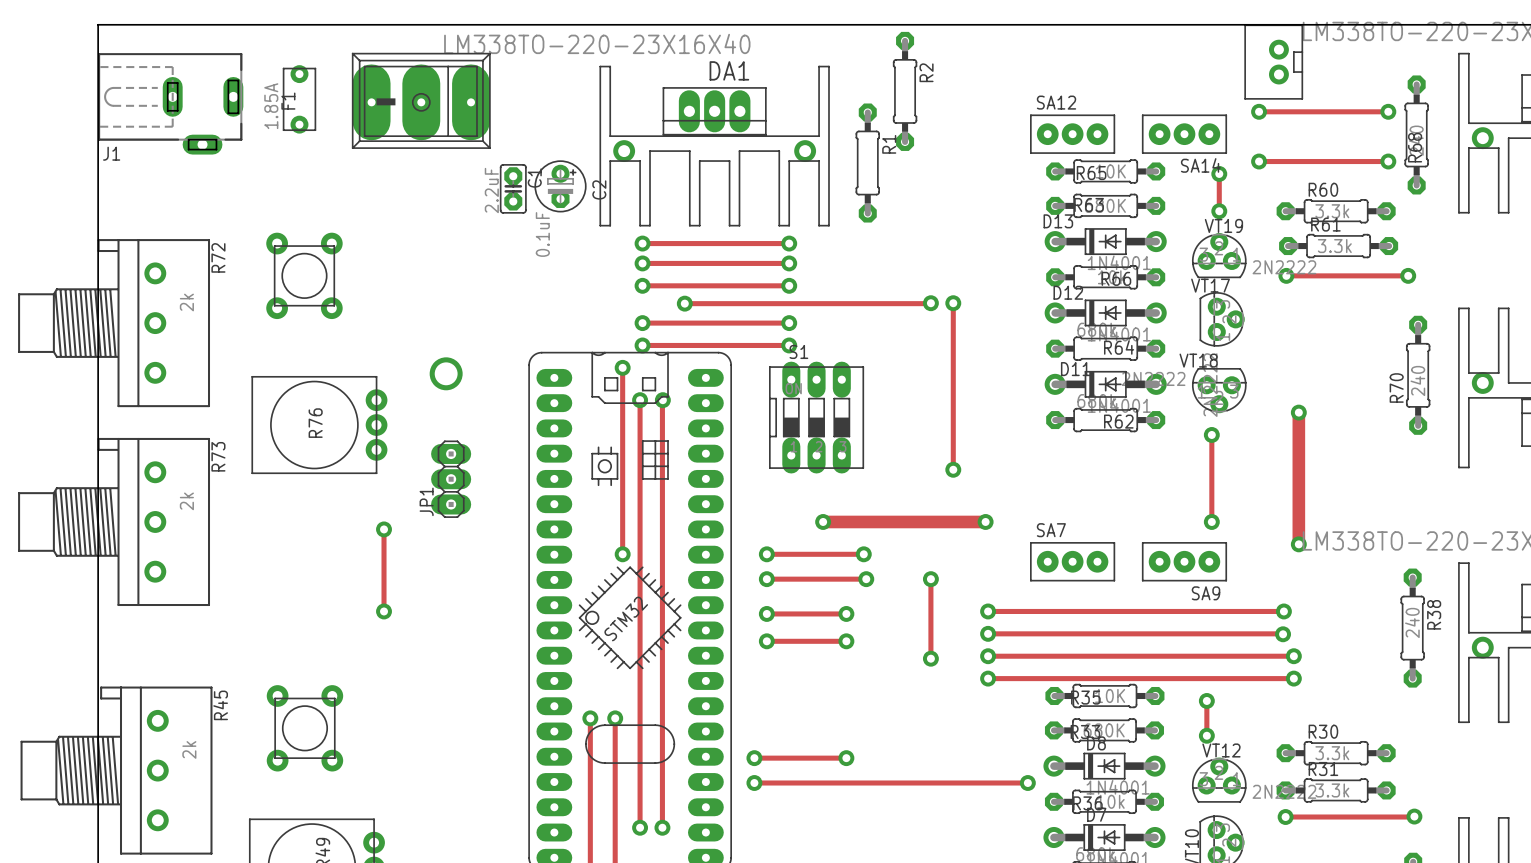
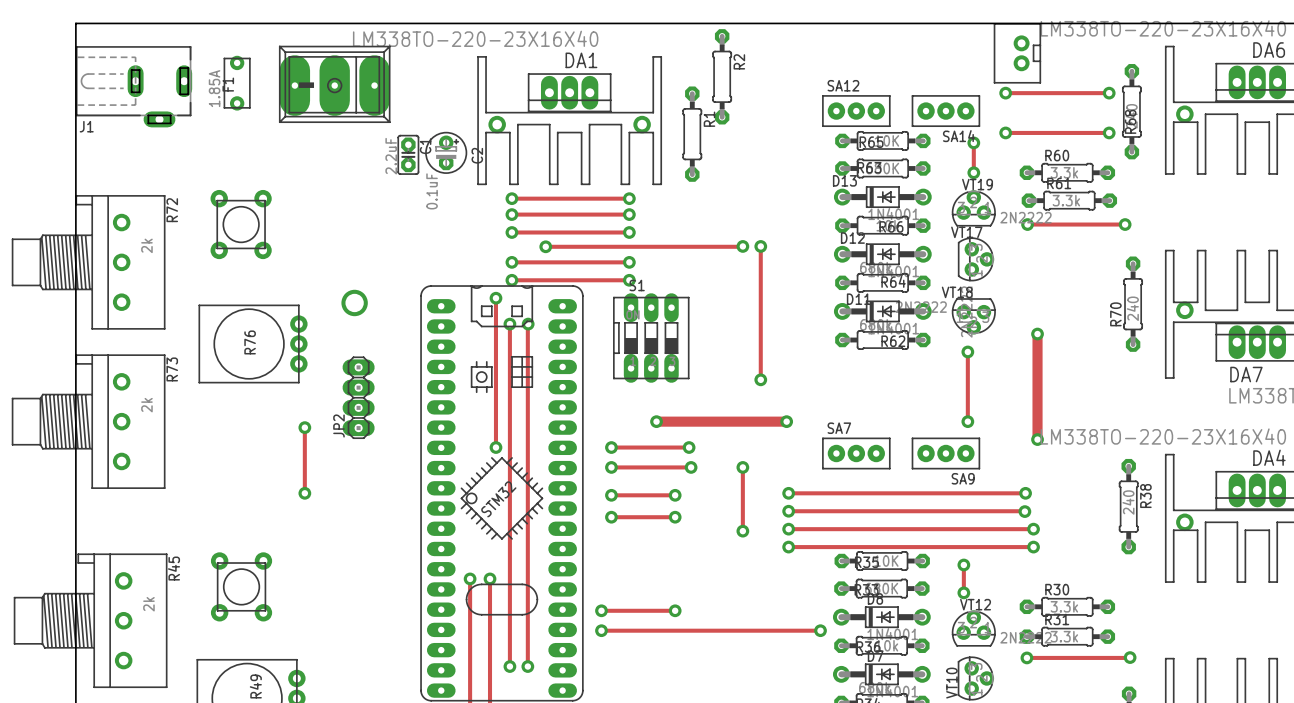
JP1: (451, 479) -> none
JP2: none -> (358, 397)

